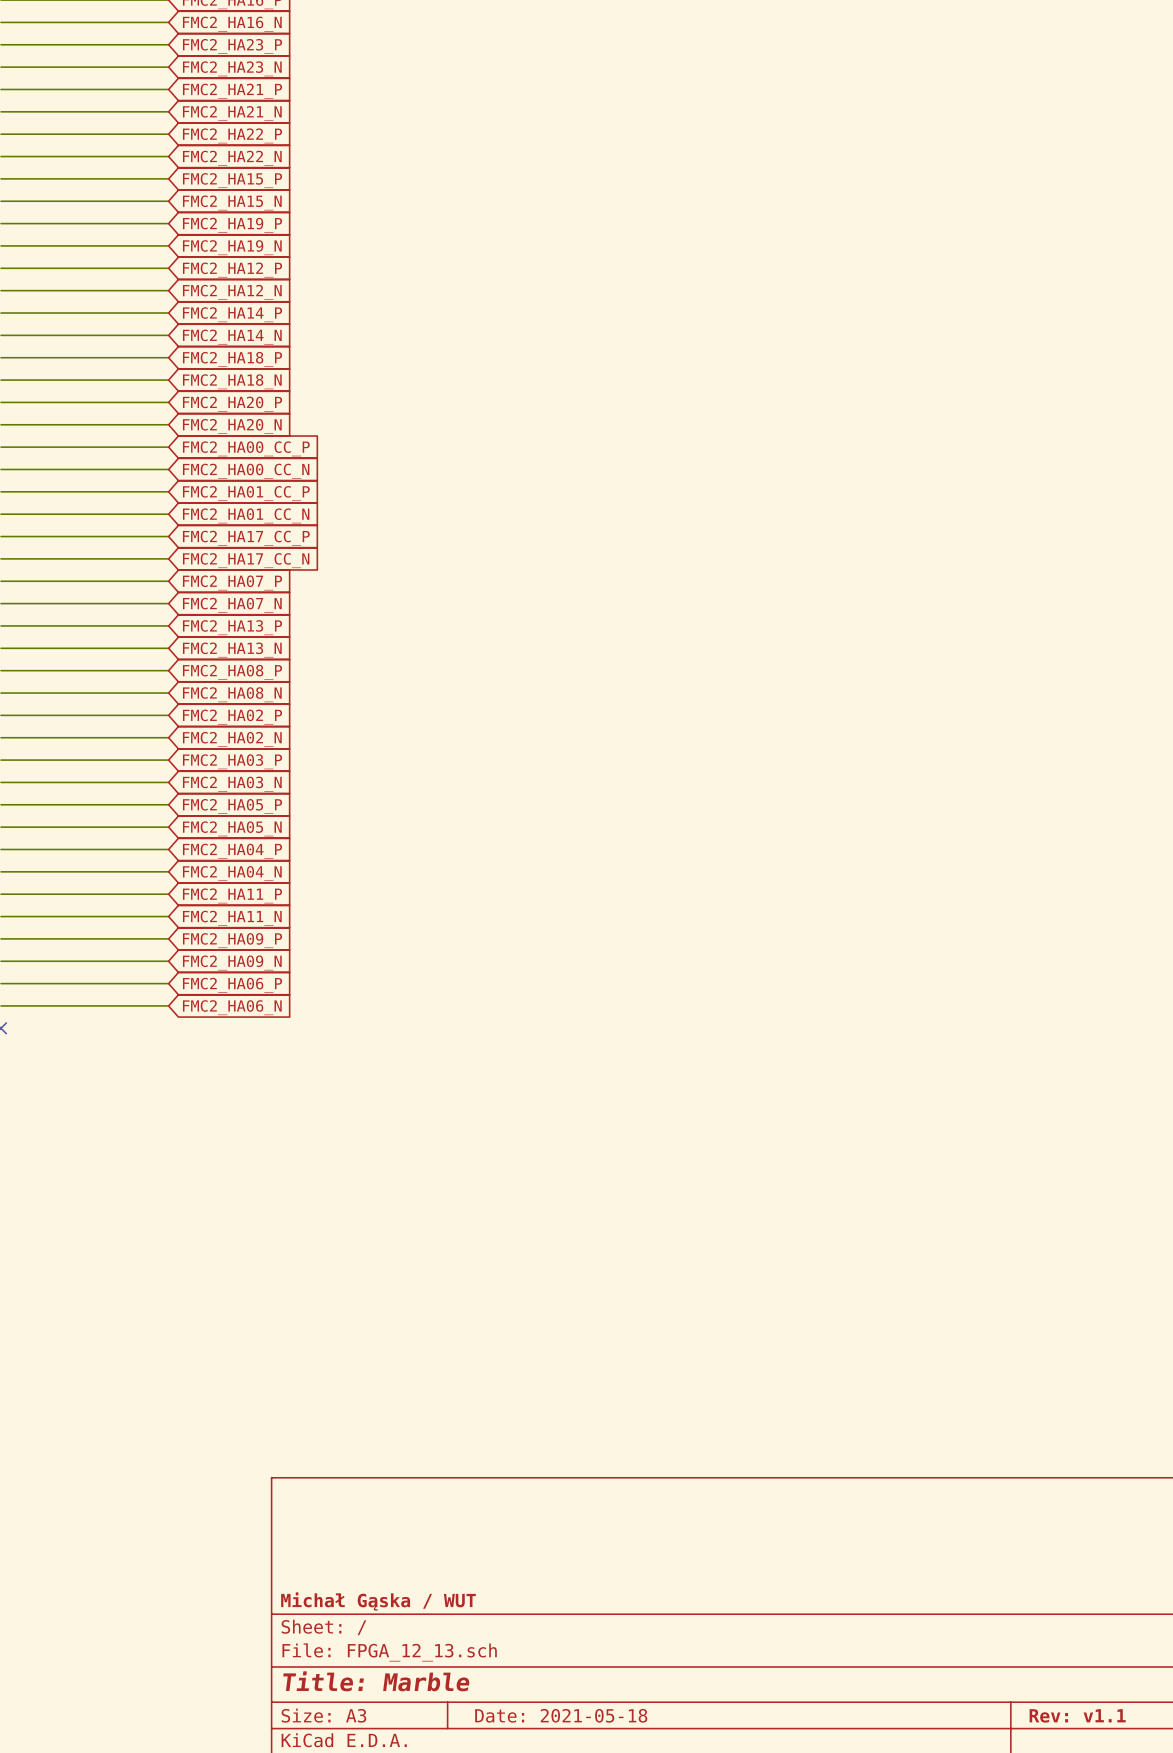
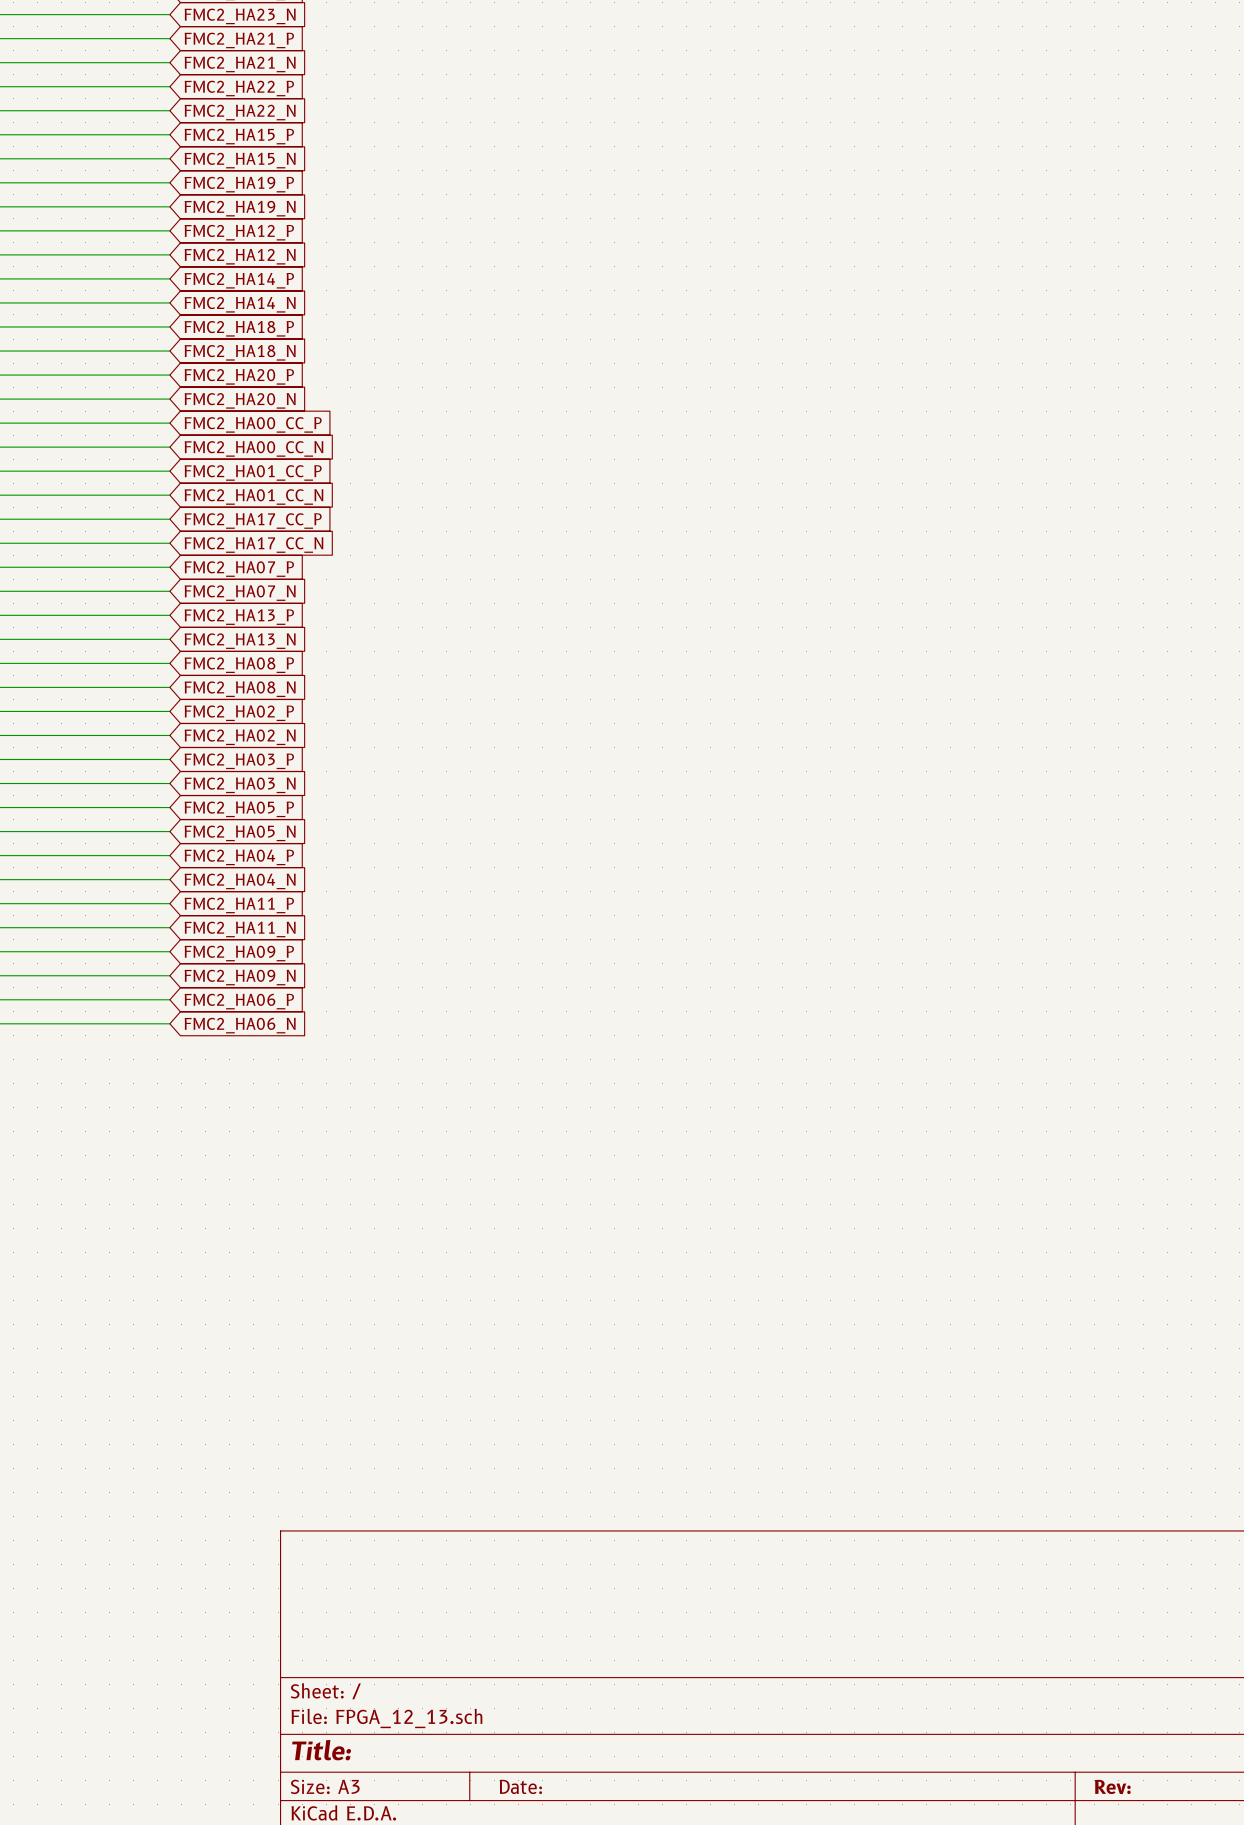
title block: Michał Gąska / WUT (378, 1601) -> none
title block: Title: Marble (376, 1681) -> Title: (321, 1750)
title block: Date: 2021-05-18 (561, 1715) -> Date: (520, 1786)
title block: Rev: v1.1 (1077, 1715) -> Rev: (1112, 1786)

